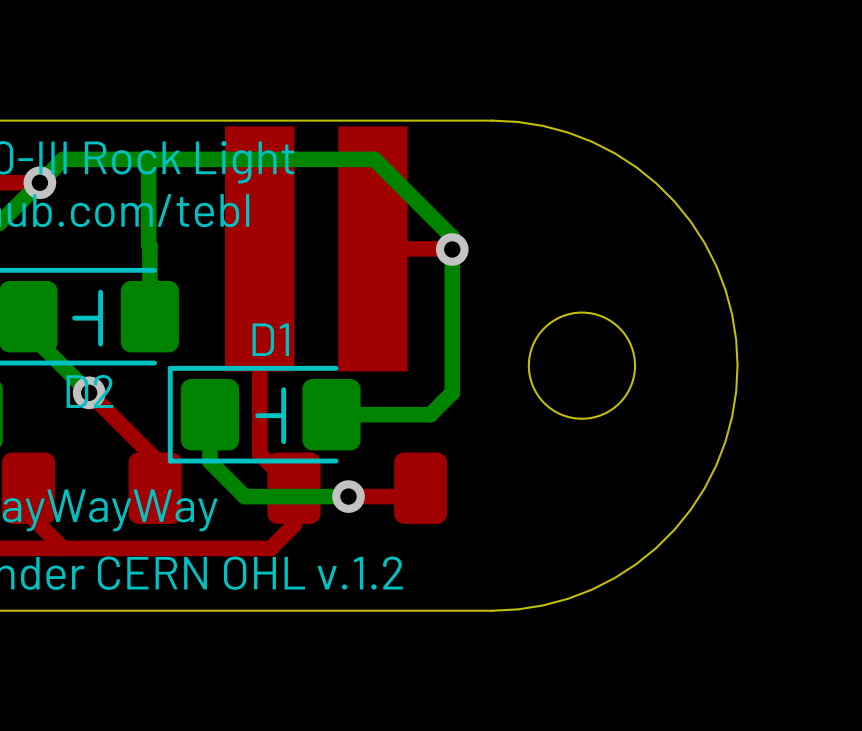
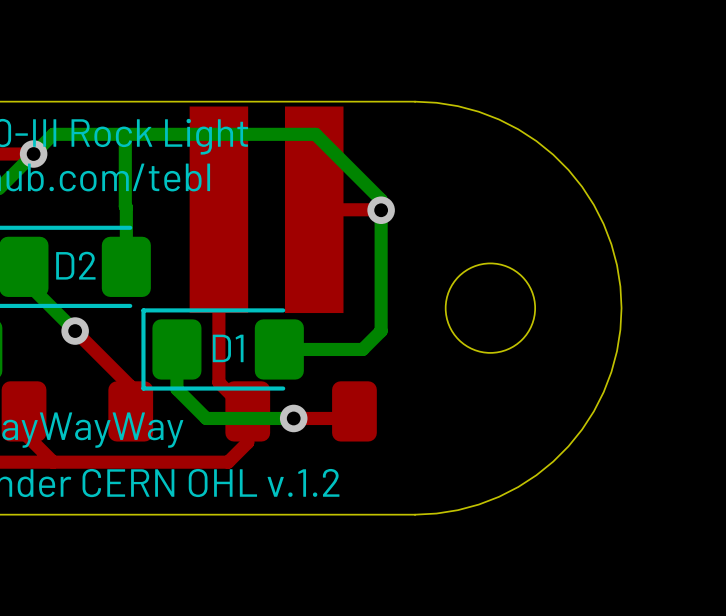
line: (100, 292) (100, 344) -> none
line: (100, 318) (74, 318) -> none
D1 name position: D1 (270, 339) -> D1 (228, 348)
line: (283, 389) (283, 441) -> none
D2 name position: D2 (90, 391) -> D2 (75, 265)
line: (283, 415) (257, 415) -> none

